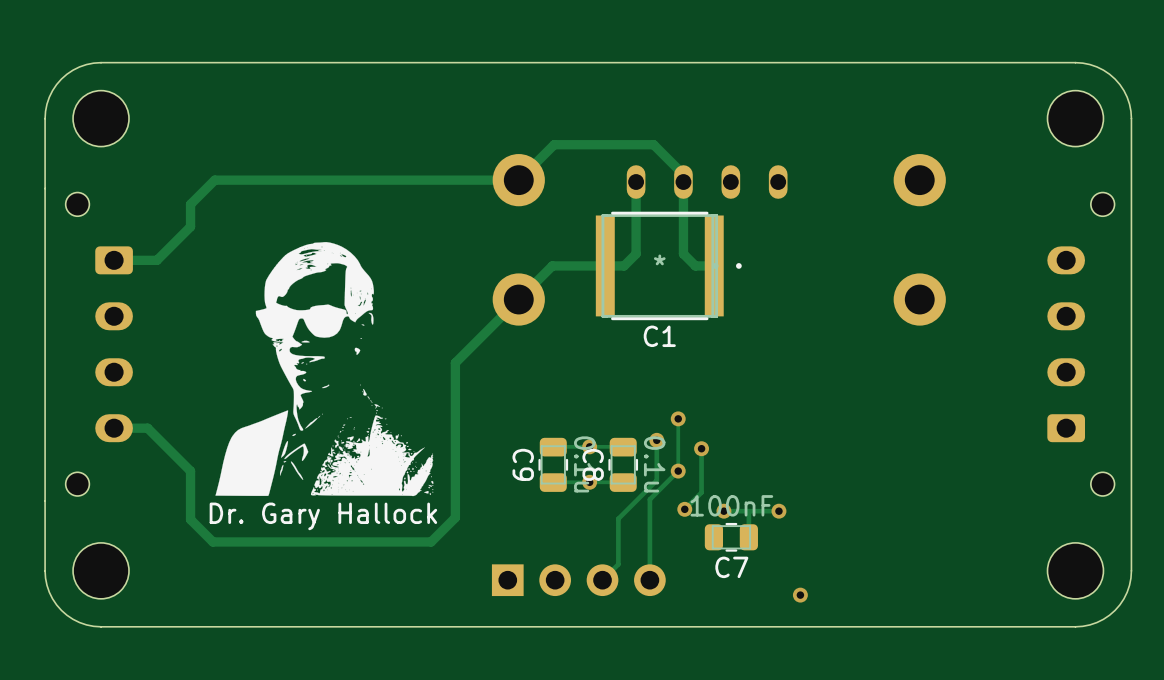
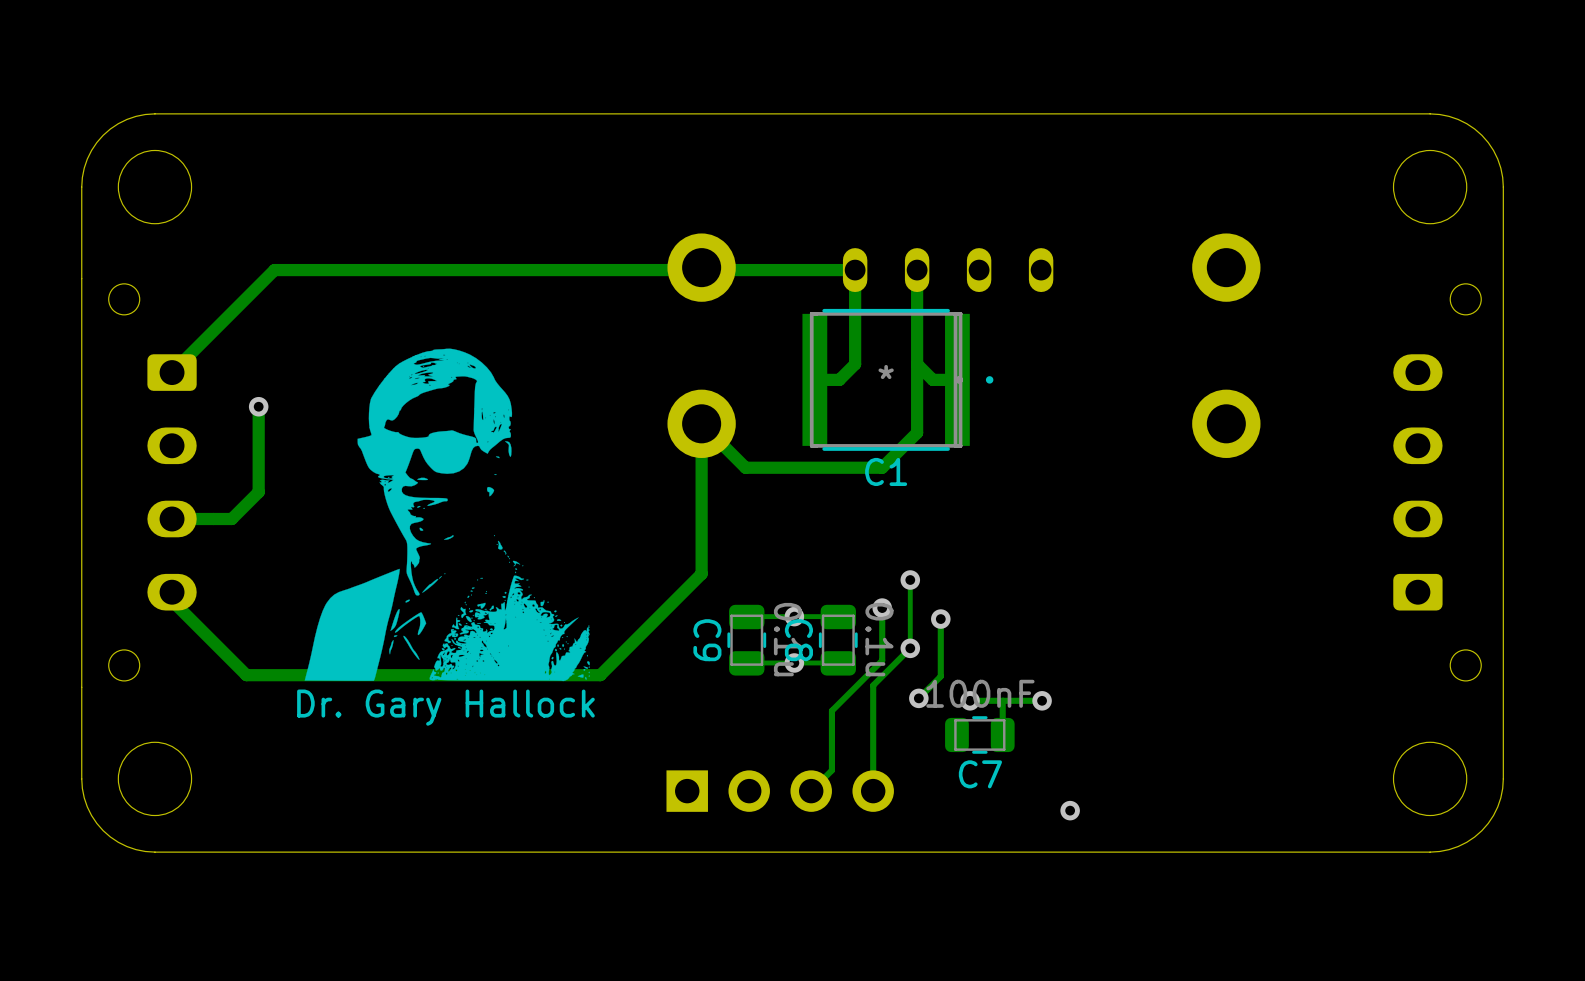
track: (683, 182) (683, 174) (653, 144) (554, 144) (518, 180) (214, 180) (190, 204) (190, 226) (156, 260) (114, 260) -> (855, 270) (274, 270) (172, 372)
track: (601, 265) (552, 265) (455, 362) (455, 517) (431, 541) (212, 541) (190, 519) (190, 471) (147, 428) (114, 428) -> (917, 364) (917, 432) (882, 467) (745, 467) (701, 423) (701, 573) (600, 675) (246, 675) (172, 600) (172, 592)
track: none -> (258, 406) (258, 492) (231, 518) (172, 518)
via: none -> (258, 406)

